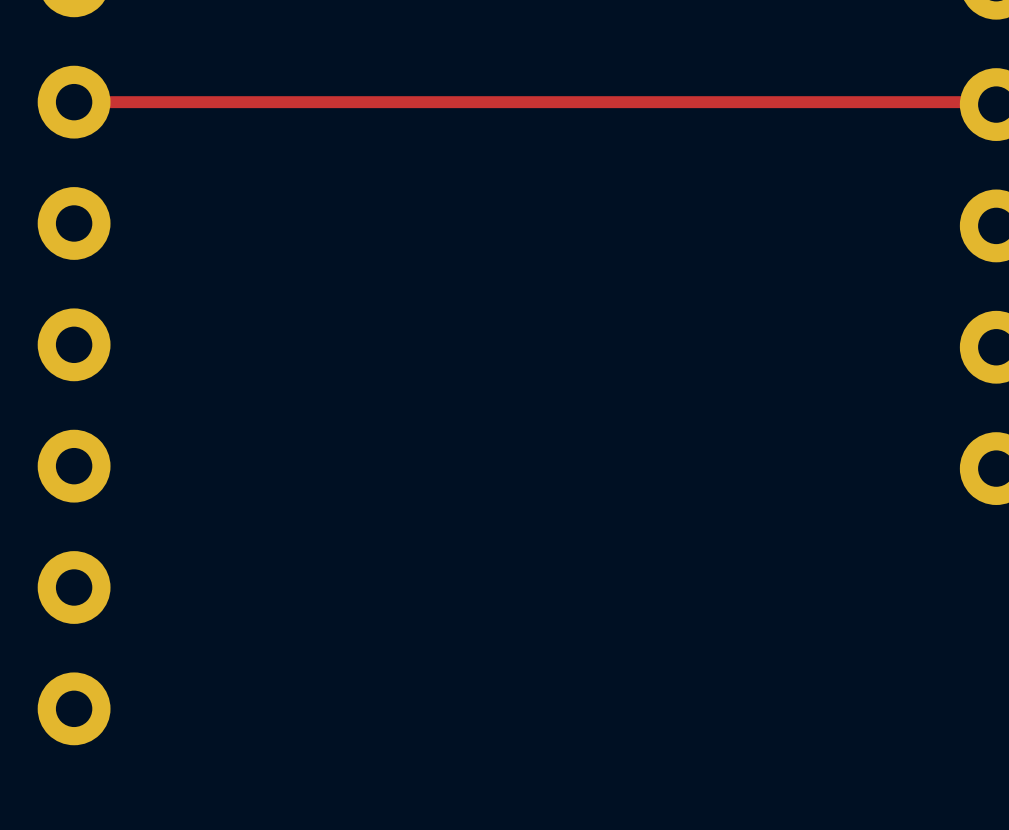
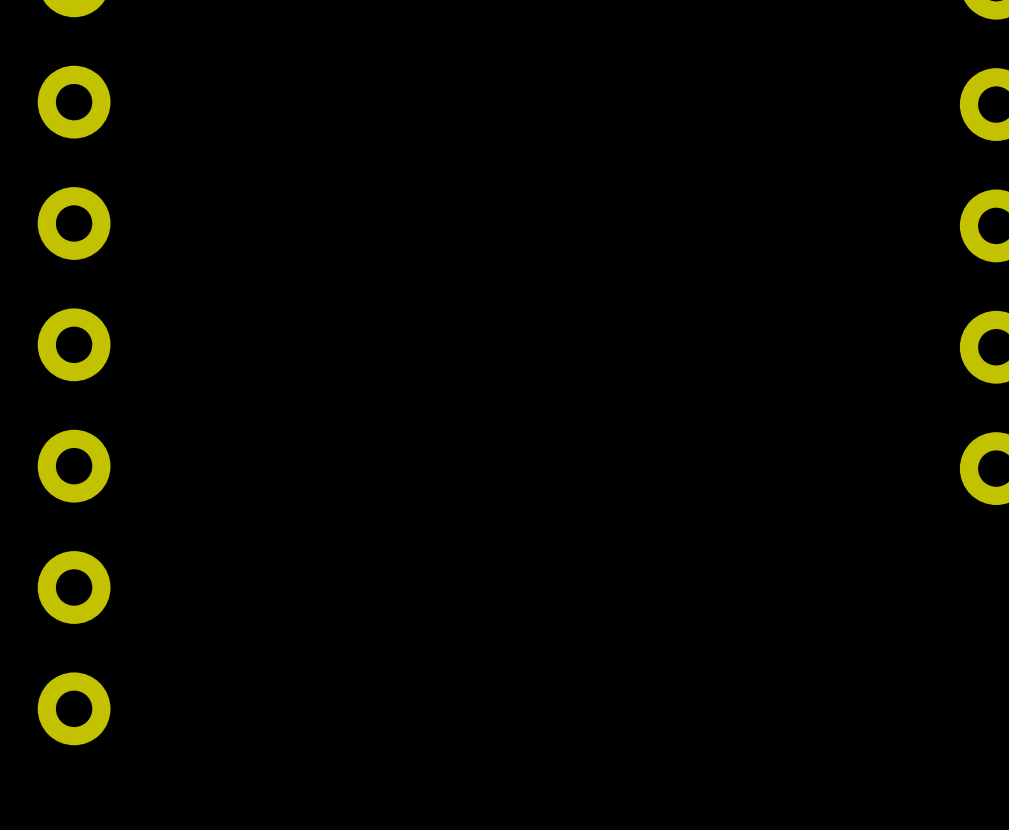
top track: (74, 102) (993, 102) (996, 104) -> none

